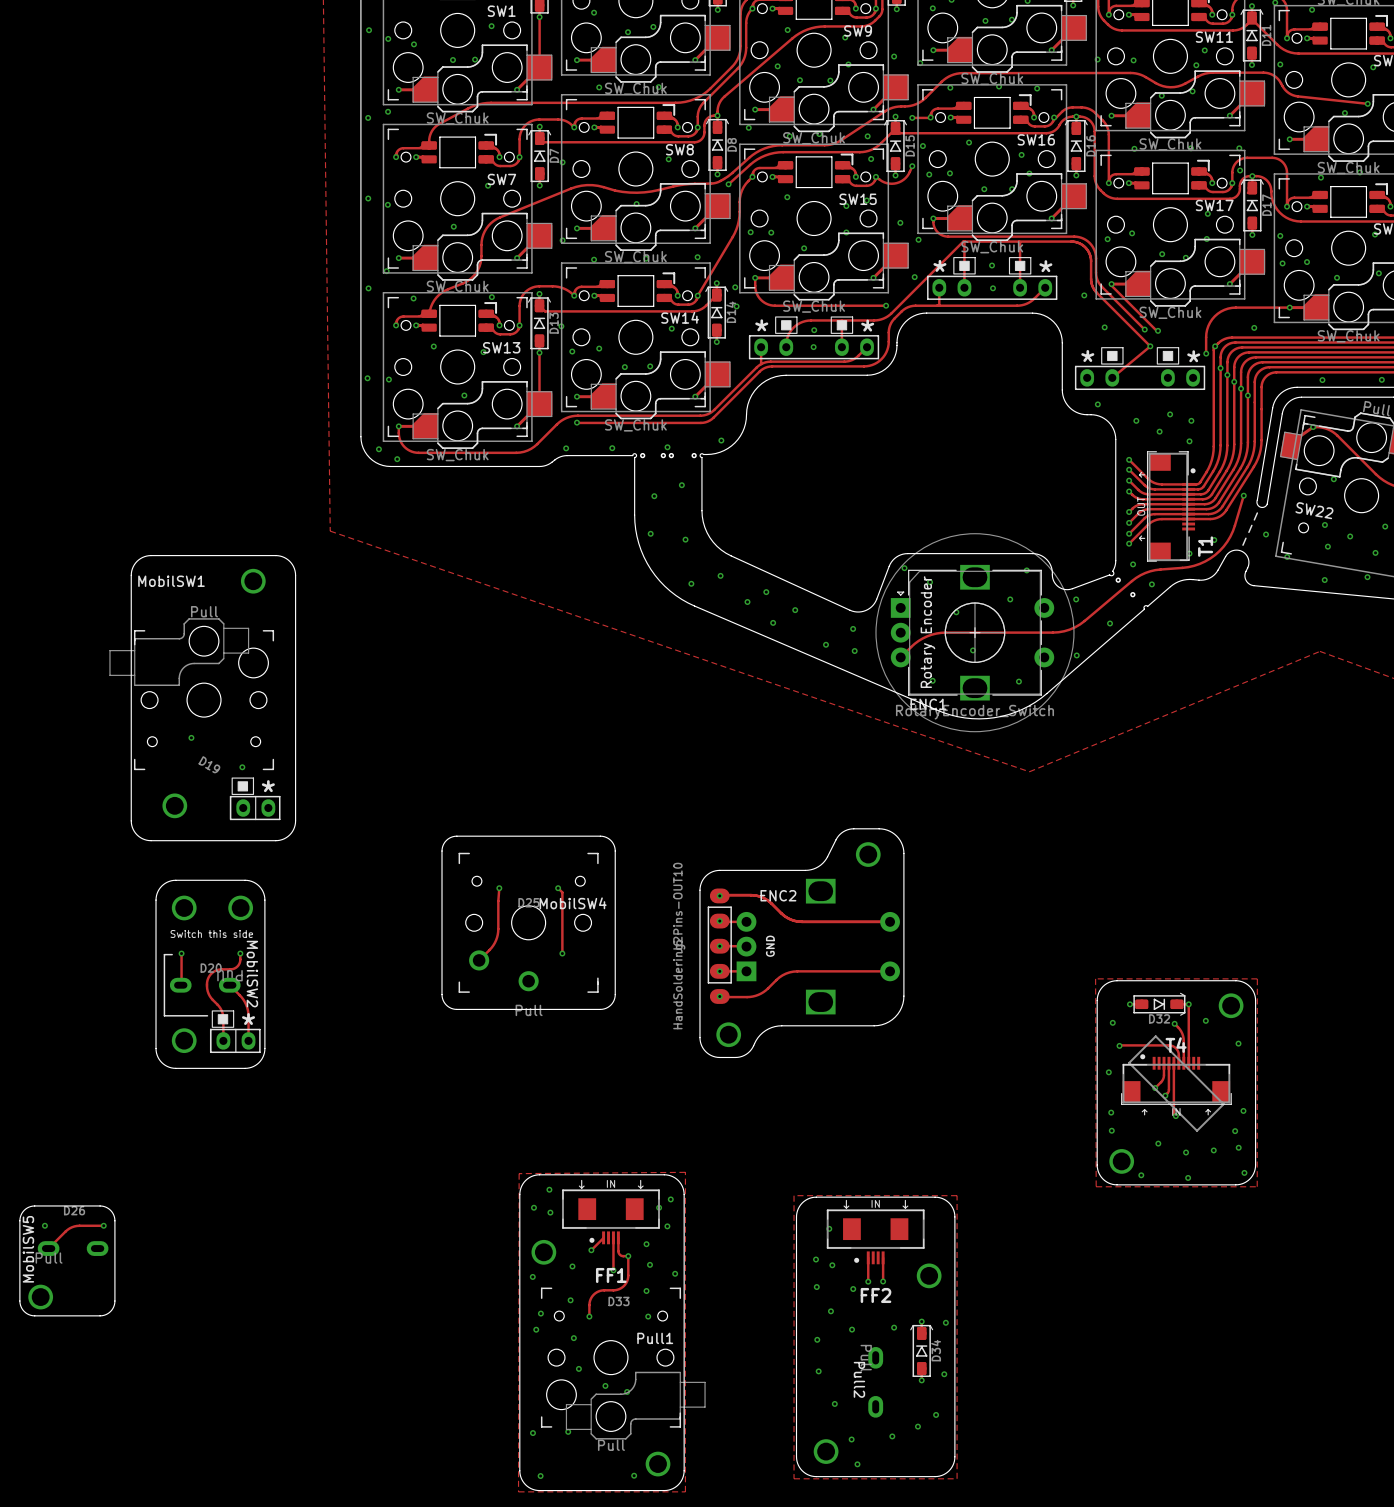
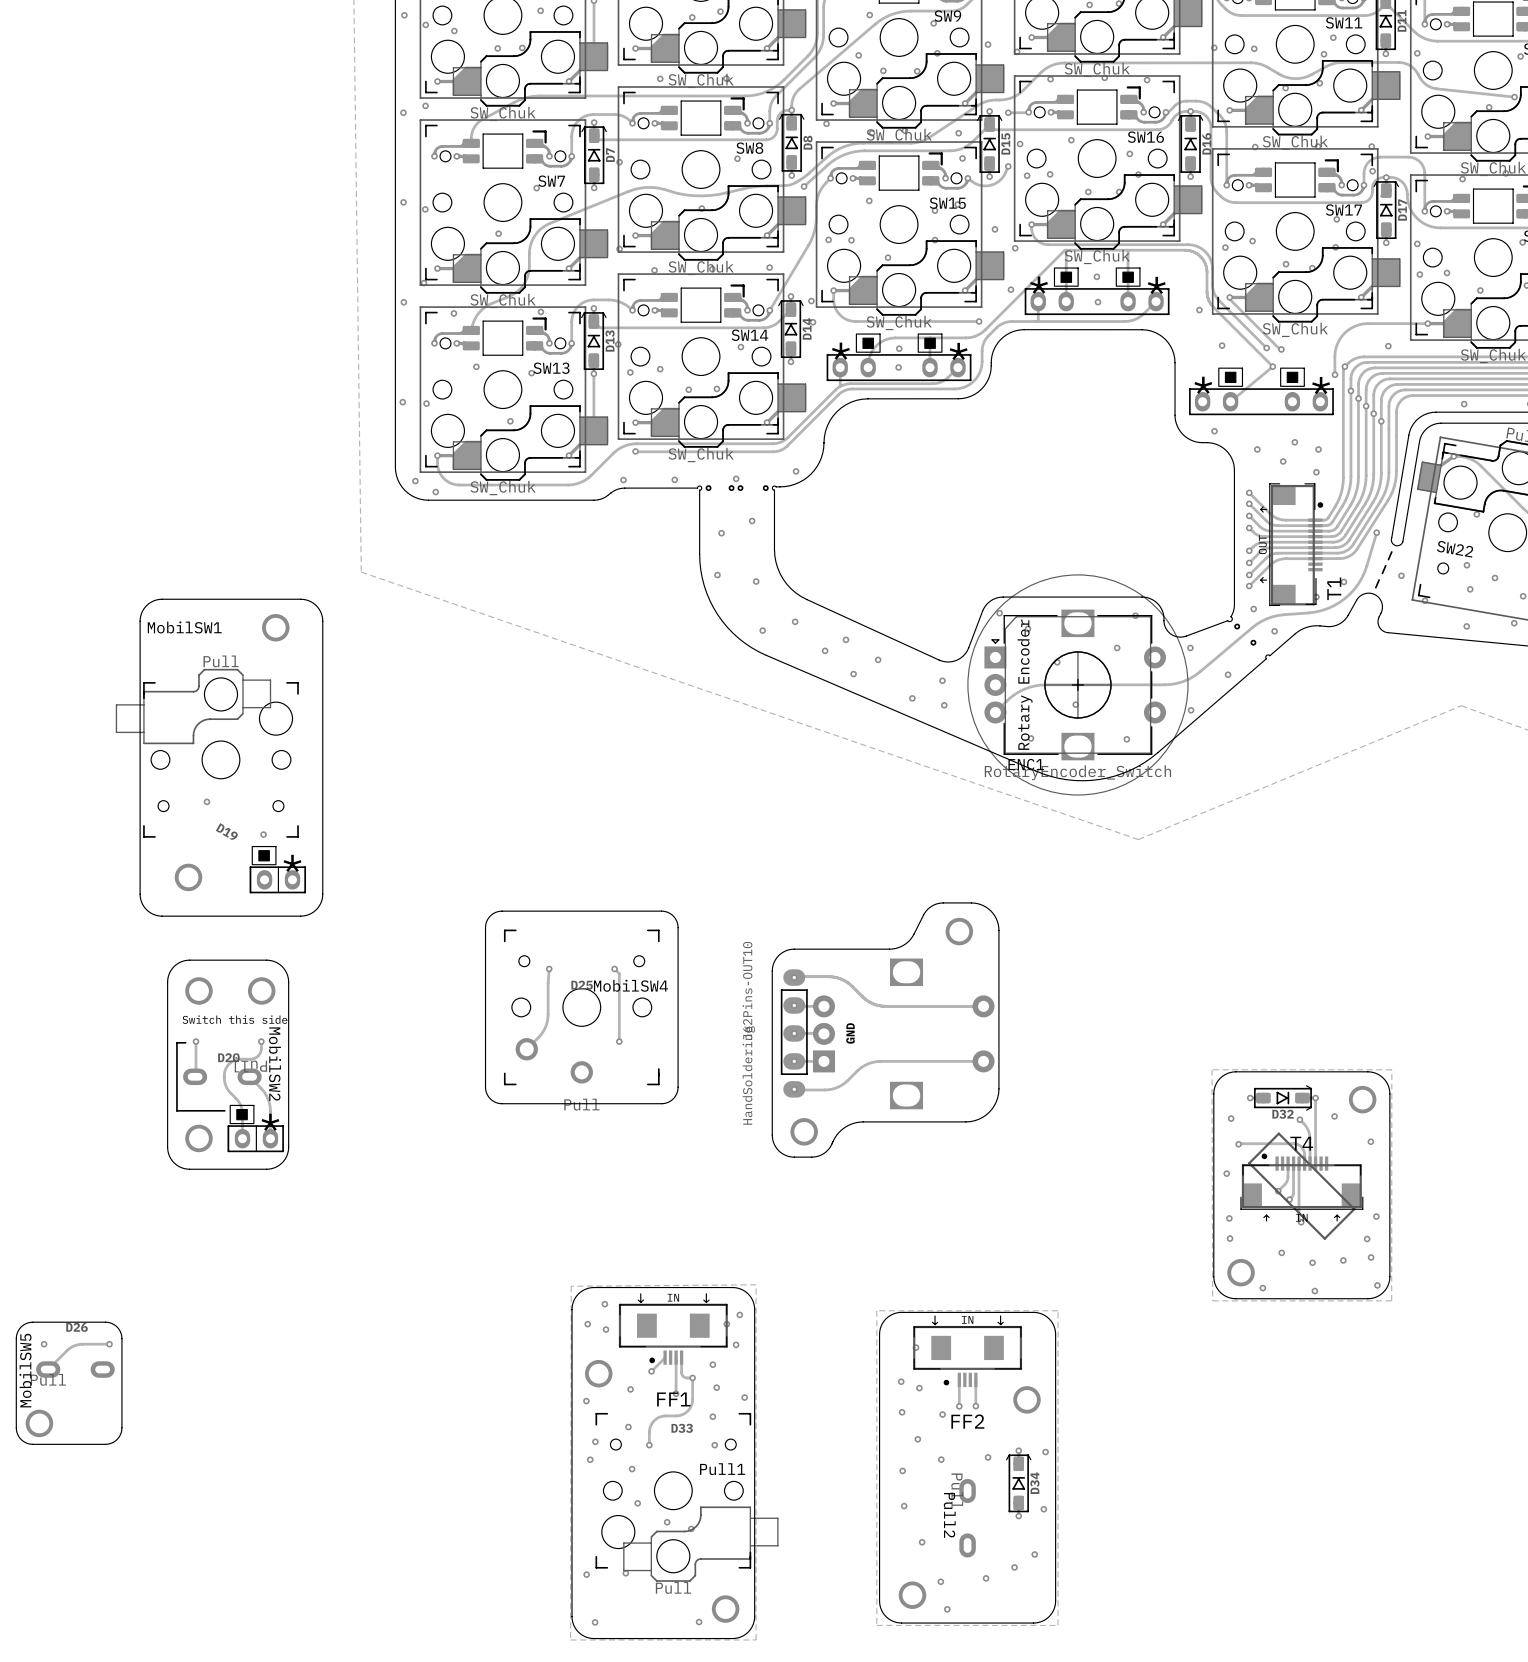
text: ENC2 (778, 895) -> none

